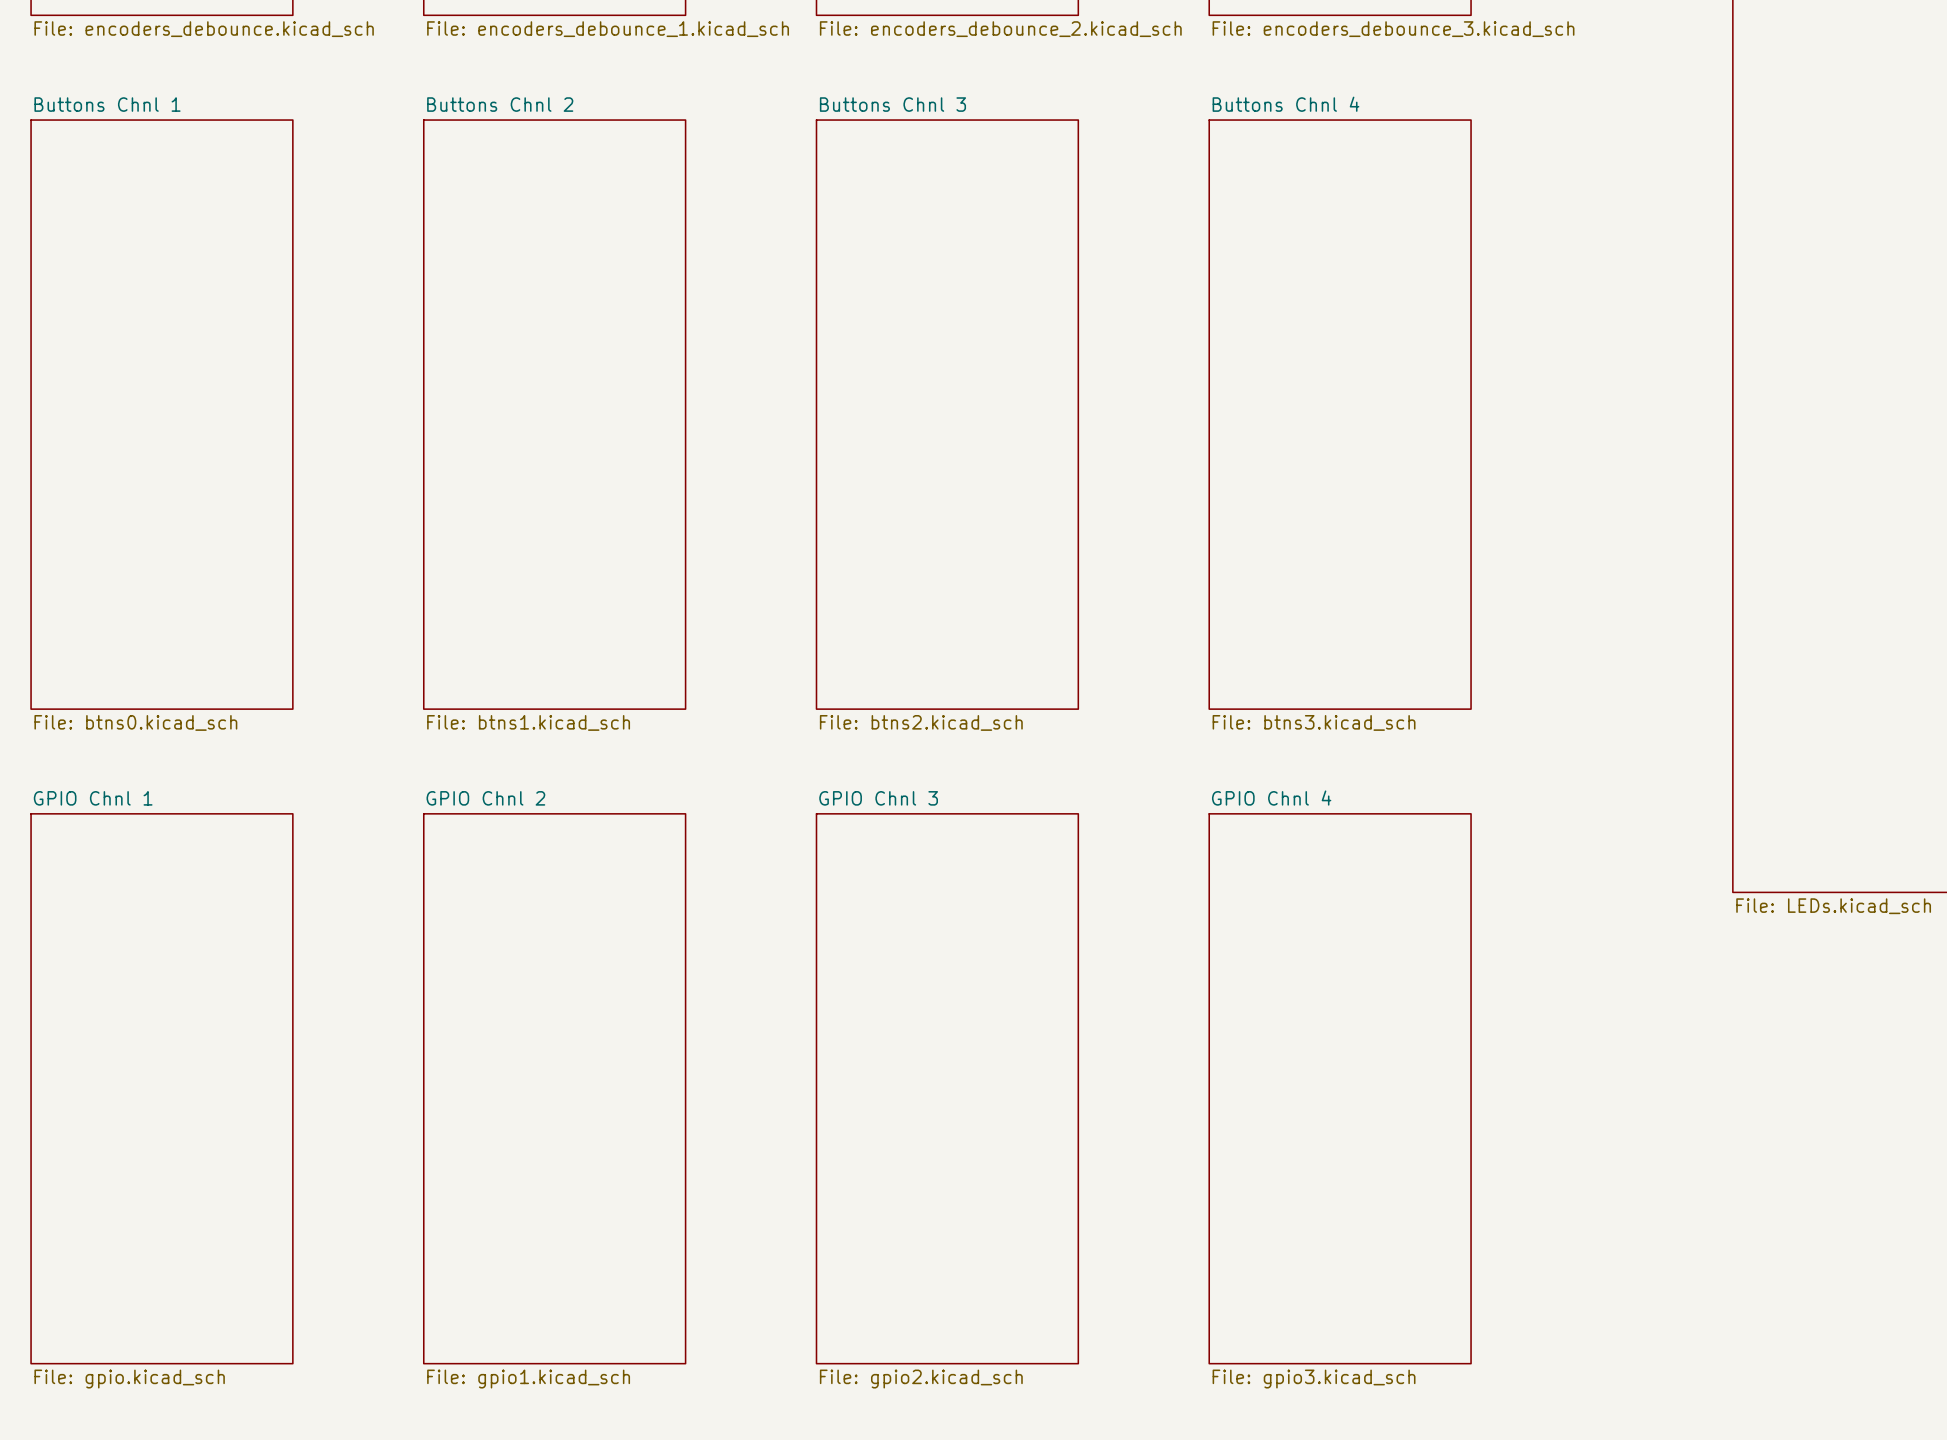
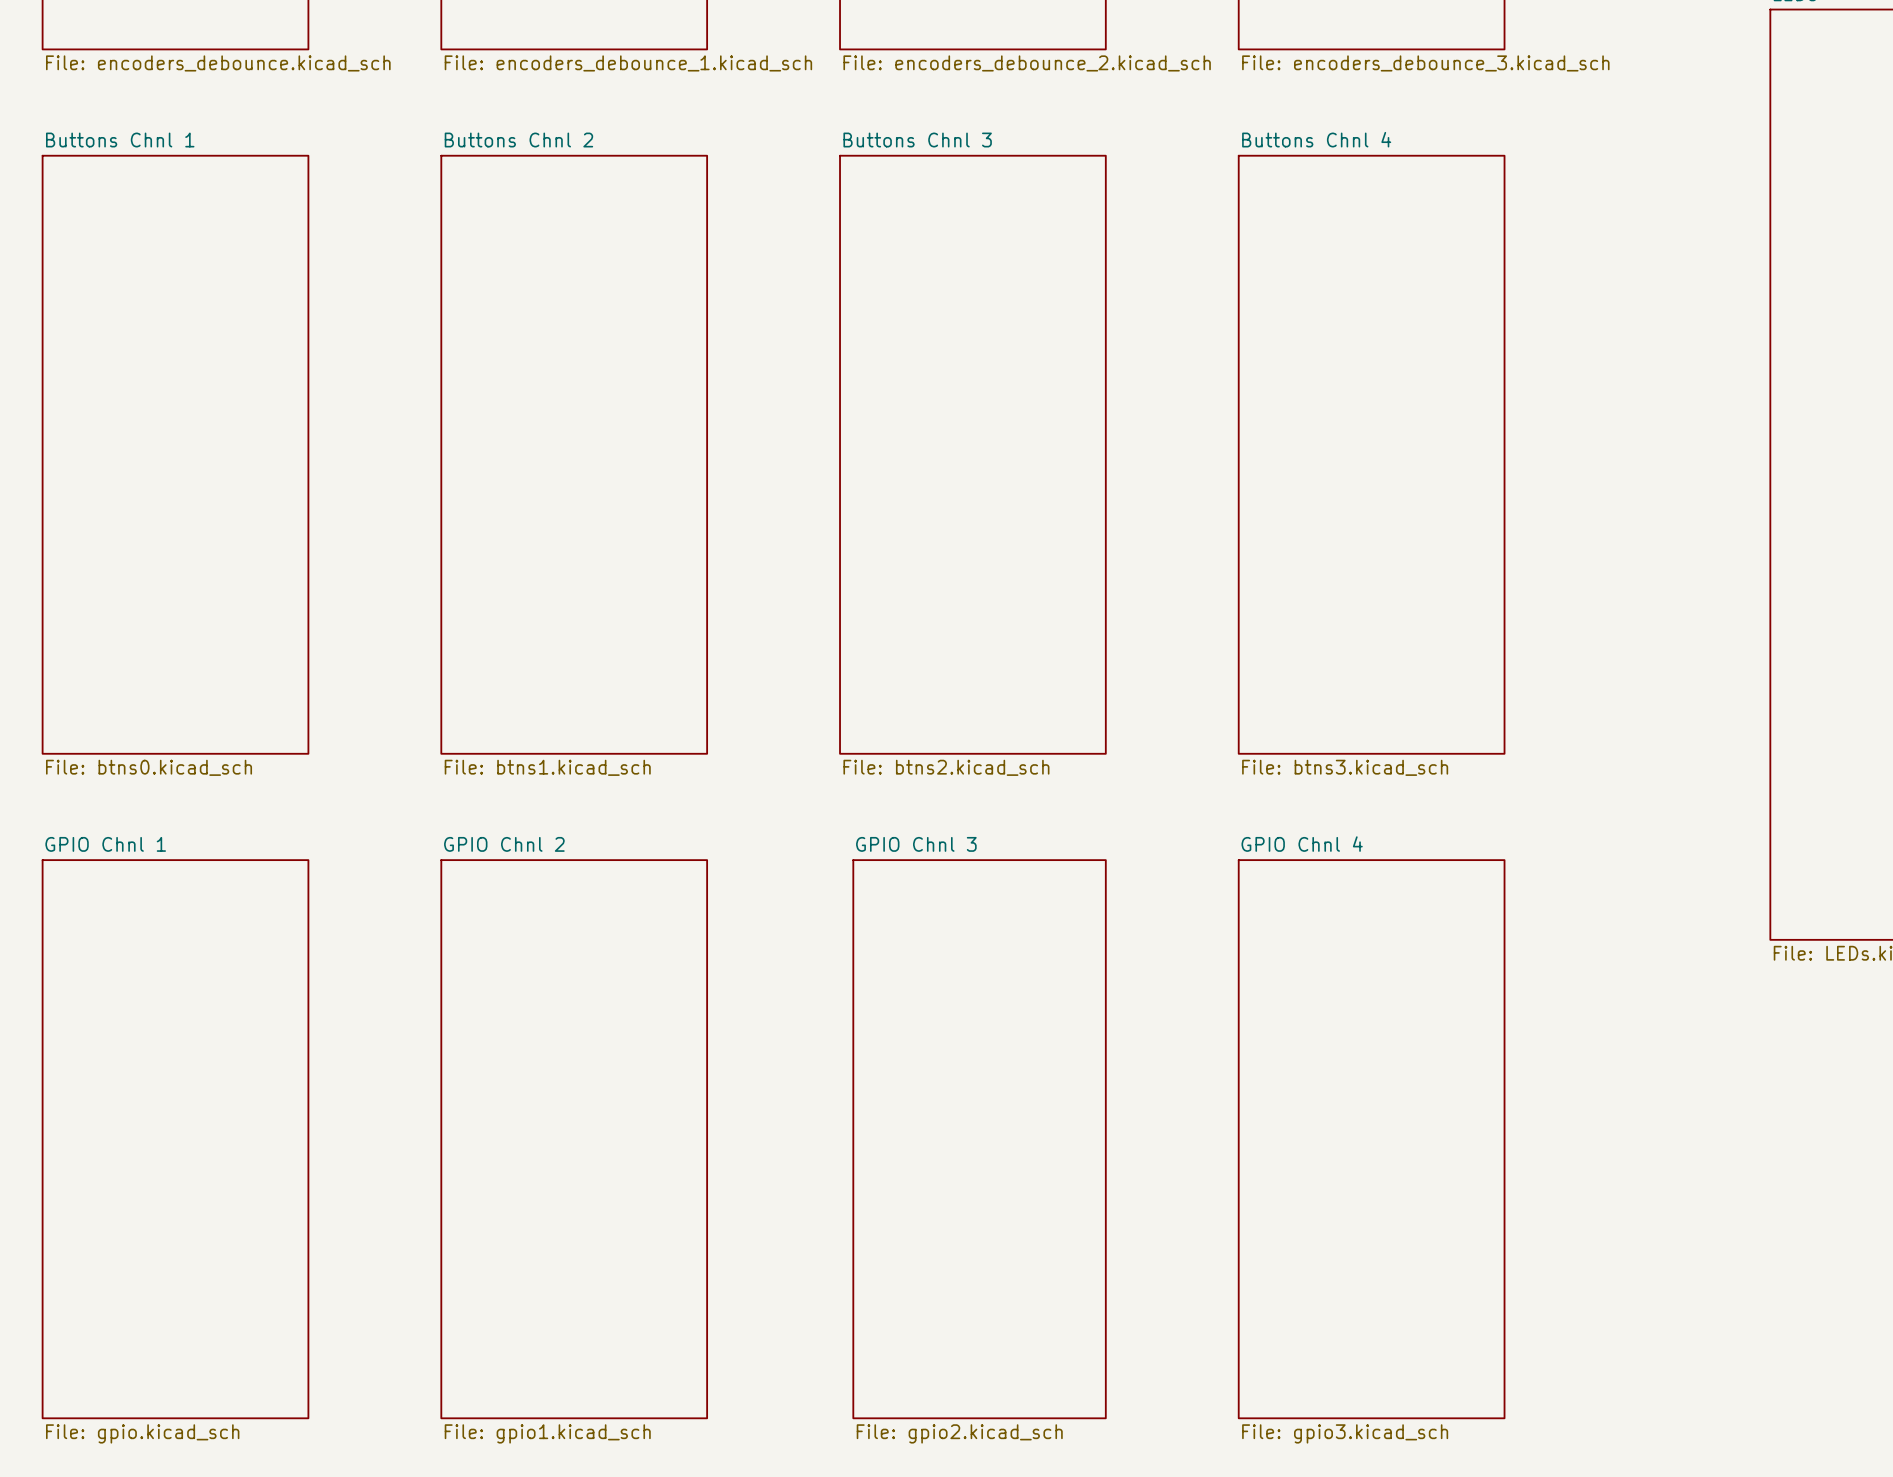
sheet GPIO Chnl 3 shape: [815, 813, 1080, 1365] -> [852, 859, 1107, 1420]

